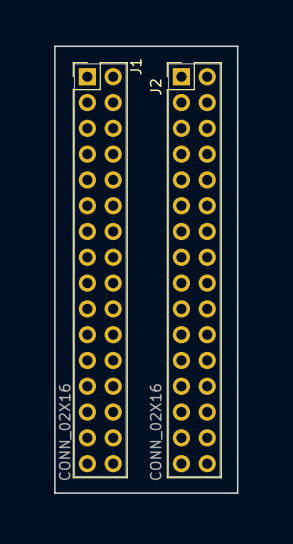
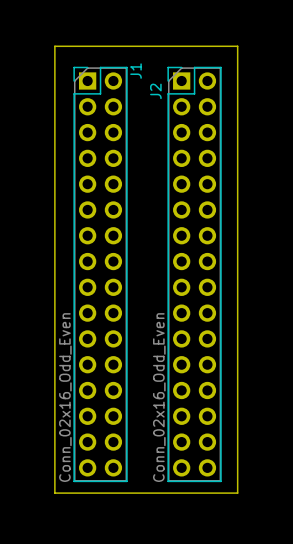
J1 footprint: [72, 62, 128, 479] -> [73, 66, 128, 482]
J2 footprint: [166, 62, 222, 479] -> [167, 66, 222, 482]
J1 value: CONN_02X16 (65, 432) -> Conn_02x16_Odd_Even (65, 397)
J2 value: CONN_02X16 (156, 432) -> Conn_02x16_Odd_Even (159, 397)

